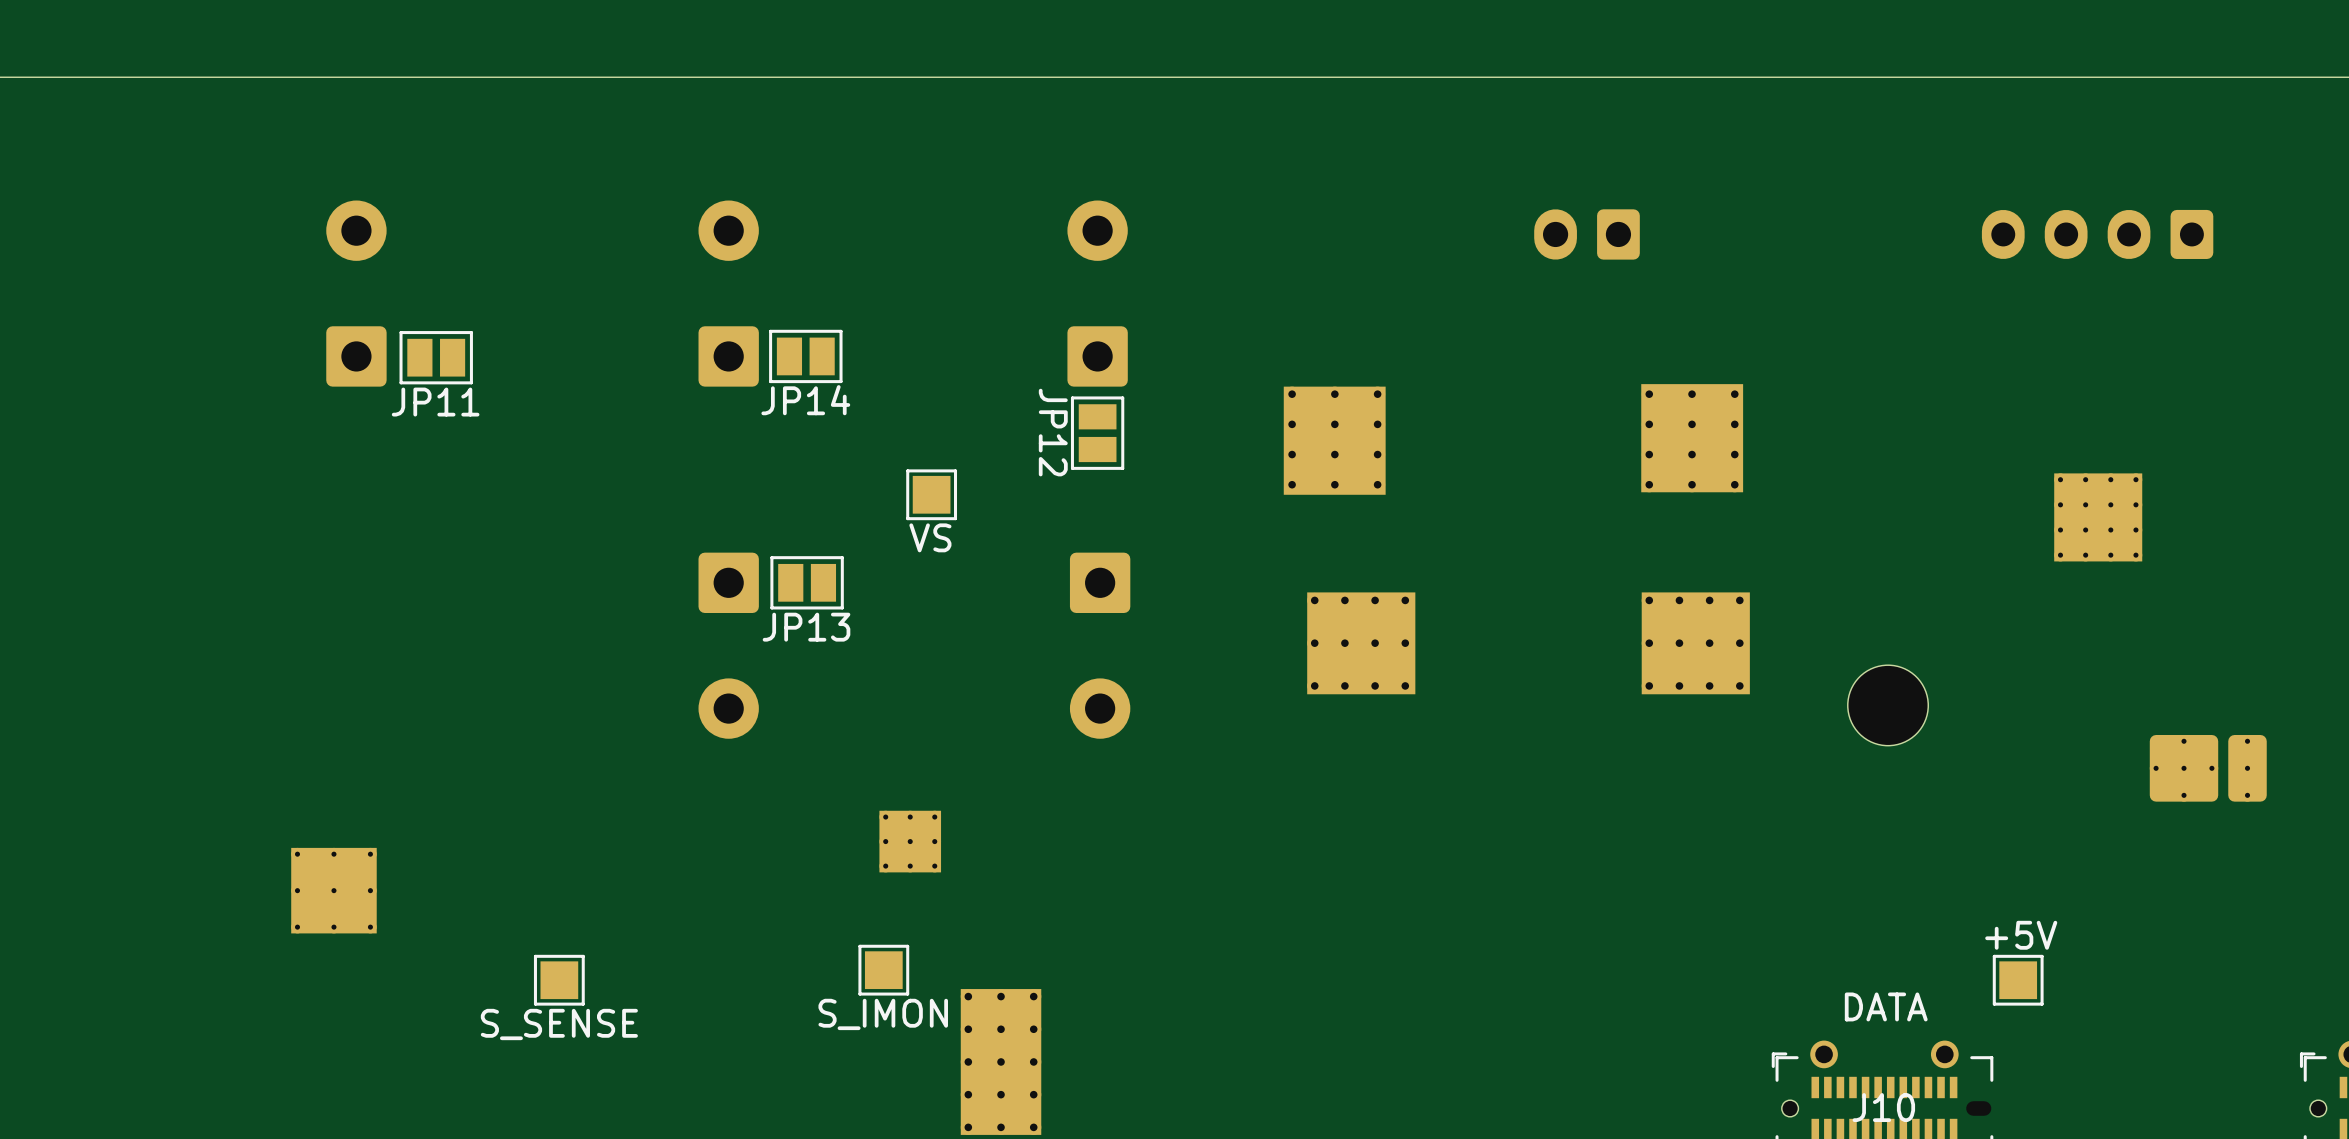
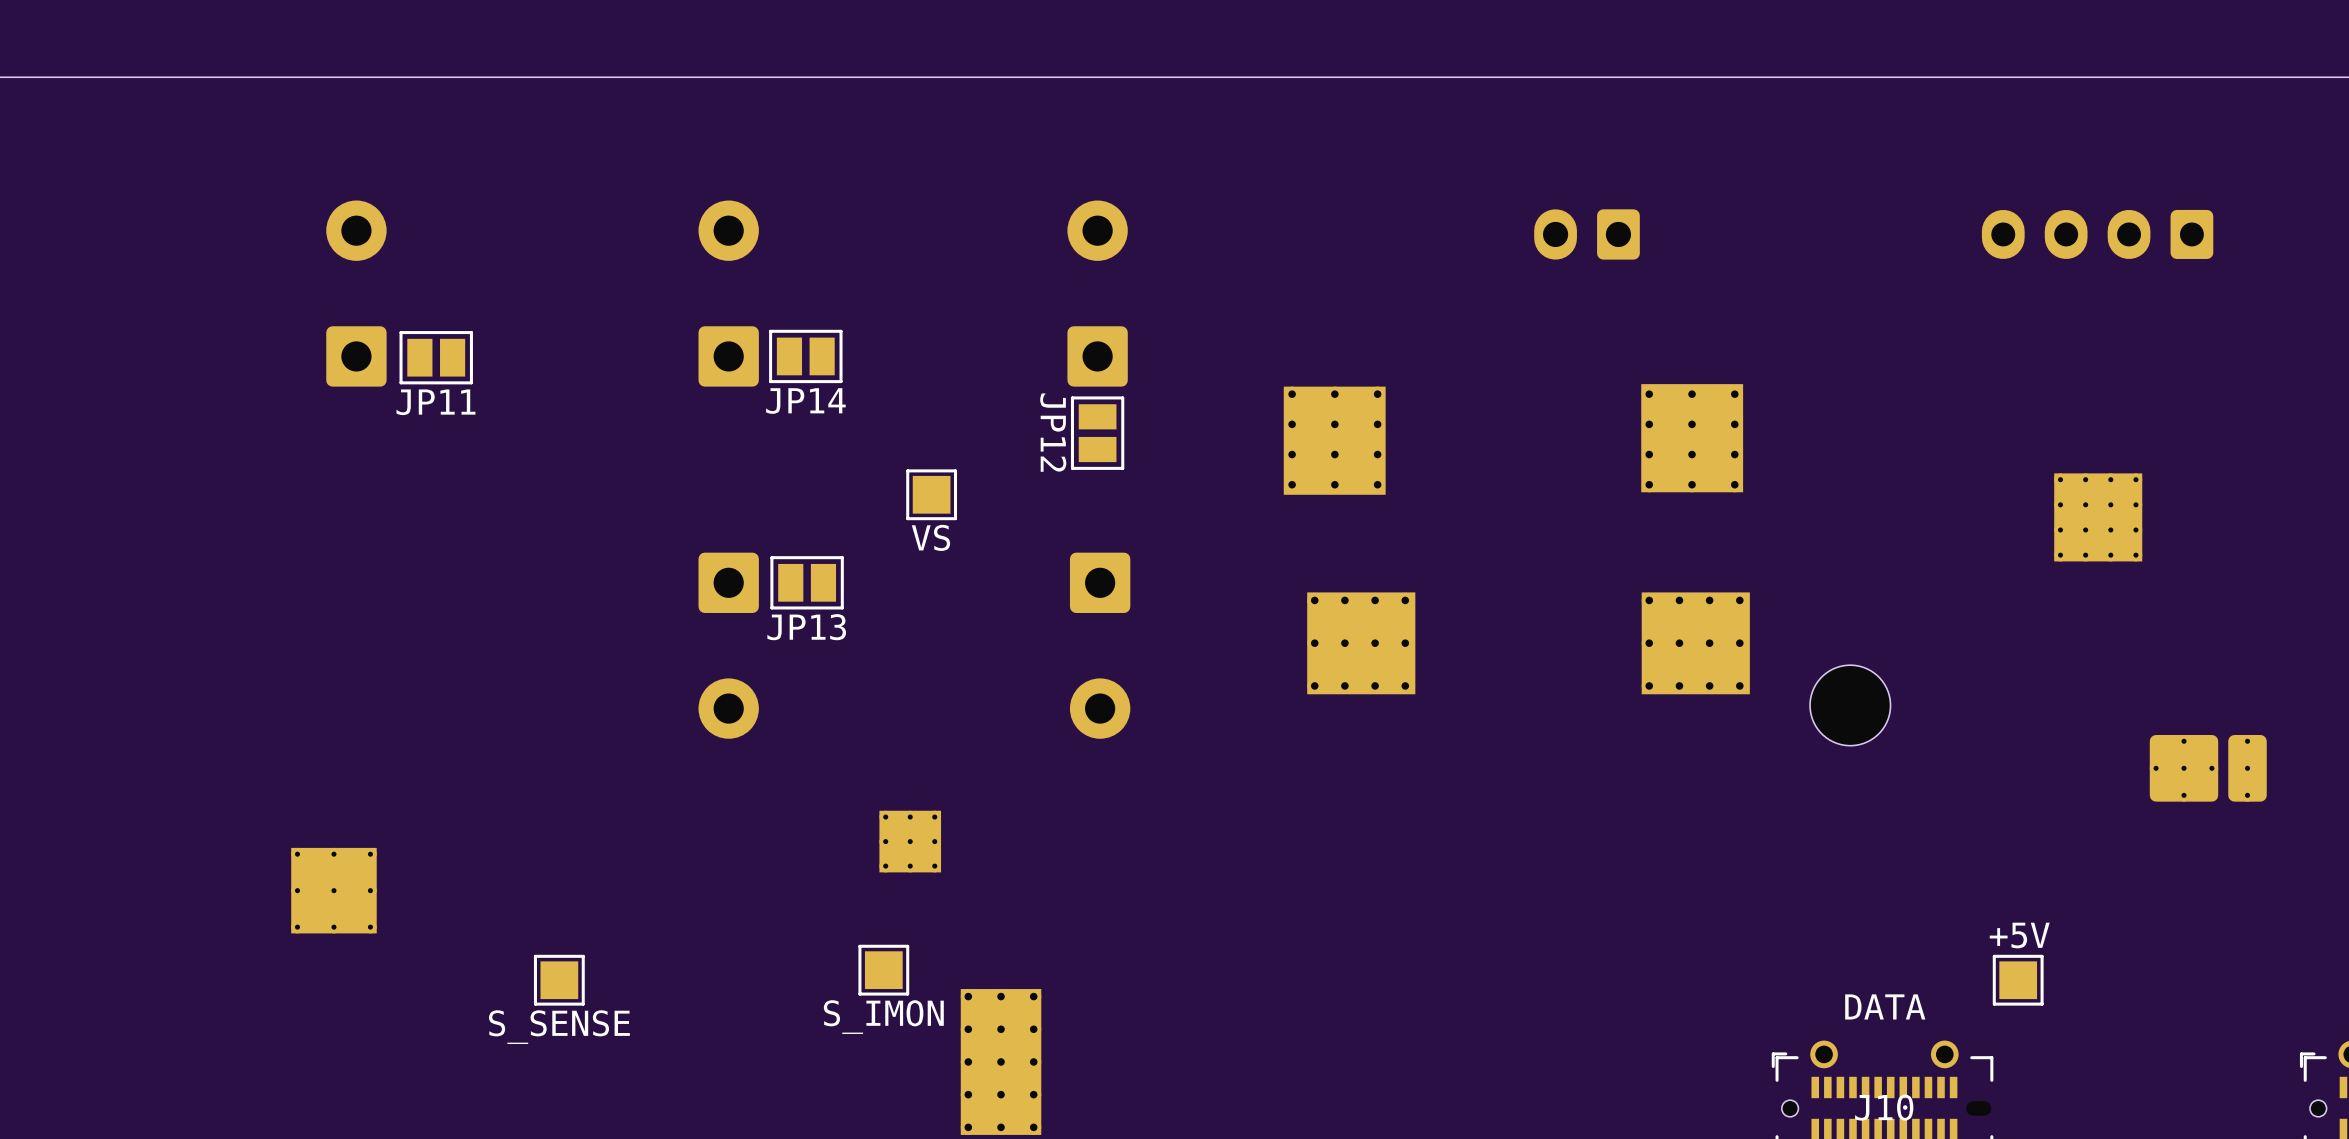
part position: (1888, 705) -> (1850, 705)

